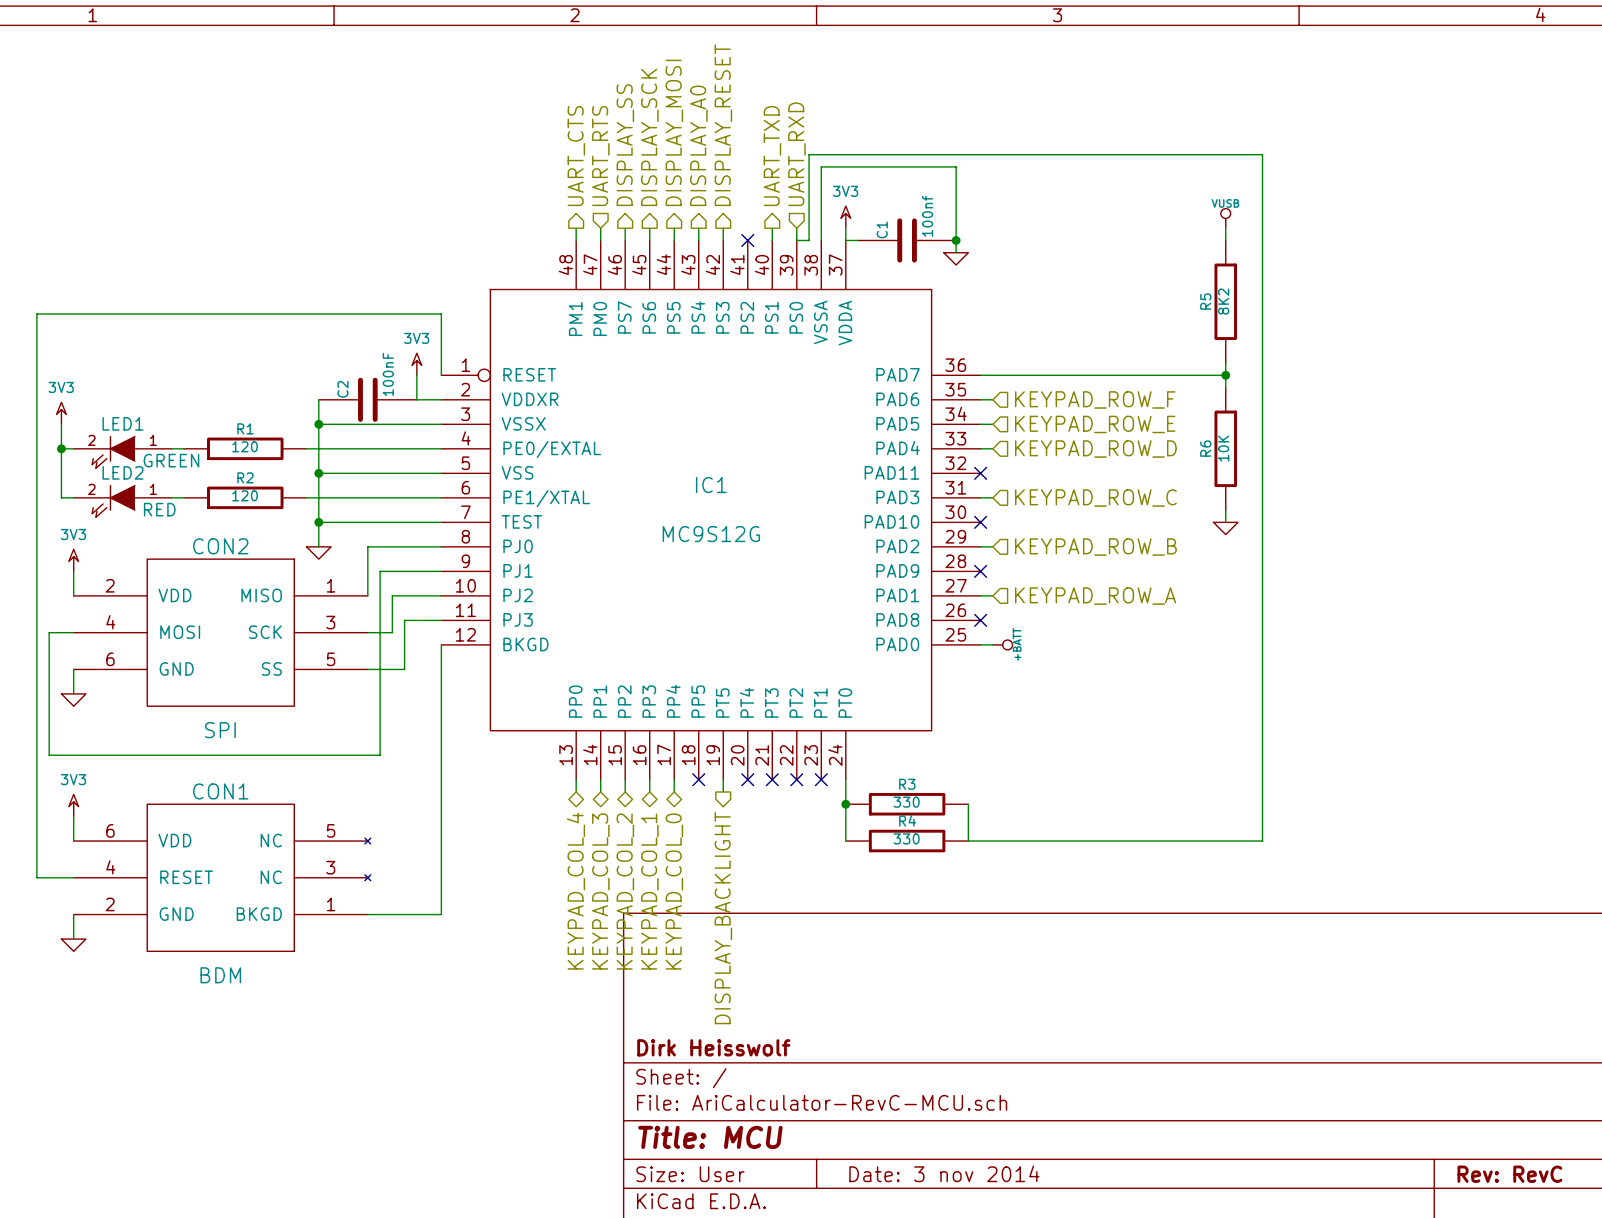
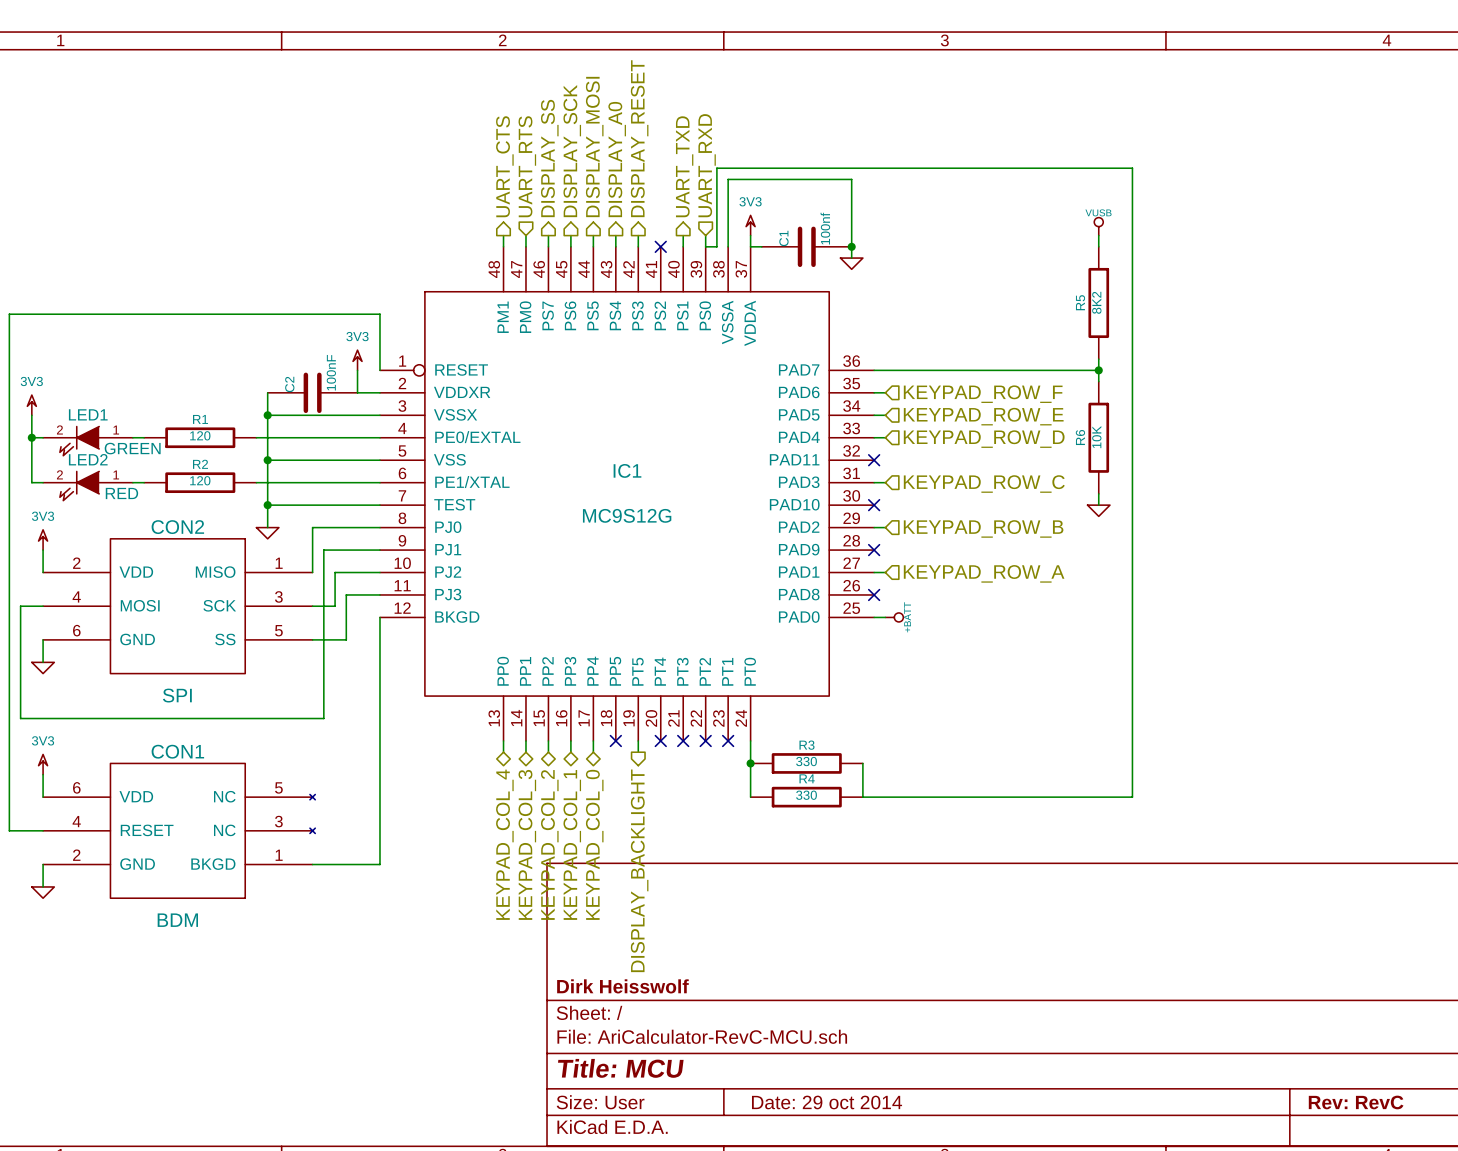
title block: Date: 3 nov 2014 (944, 1173) -> Date: 29 oct 2014 (827, 1102)

